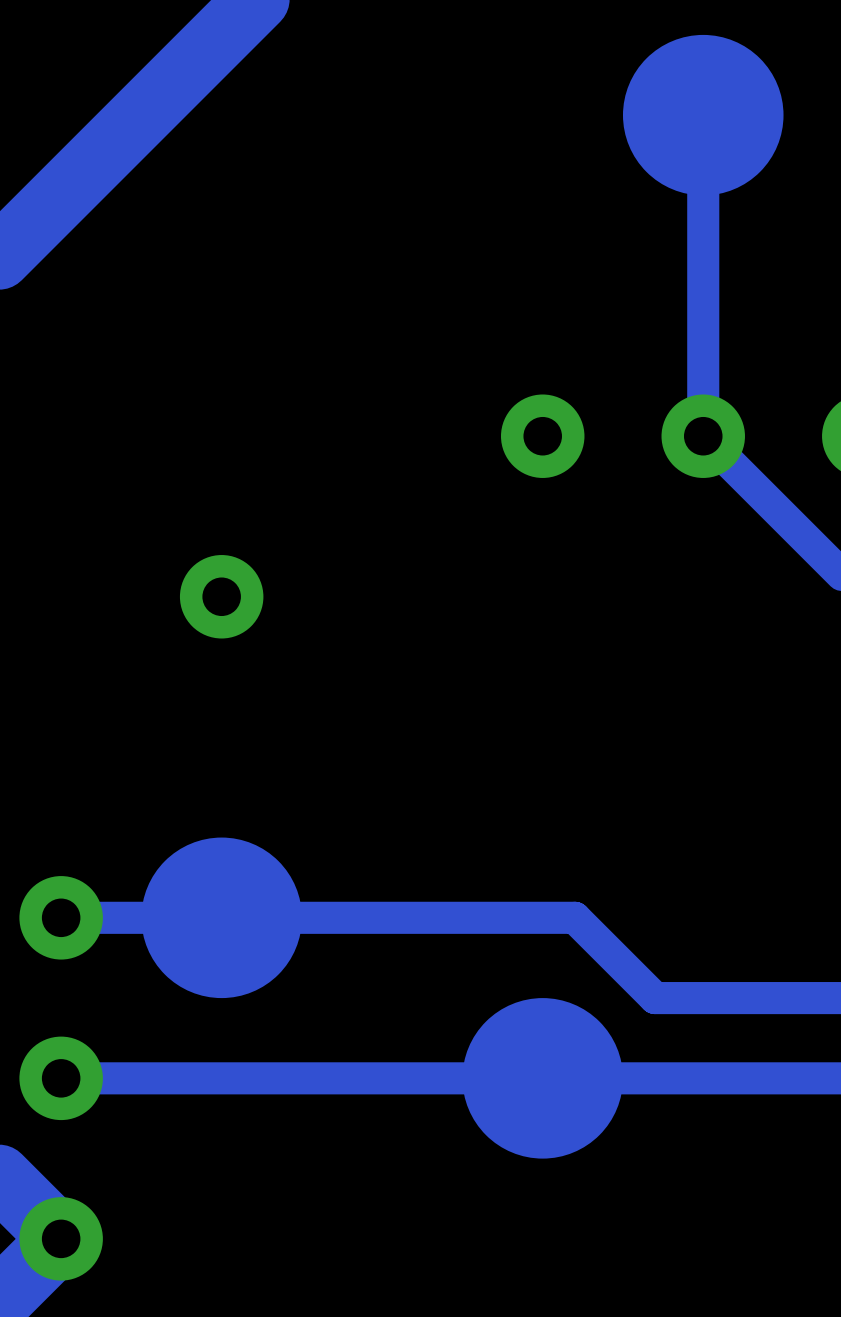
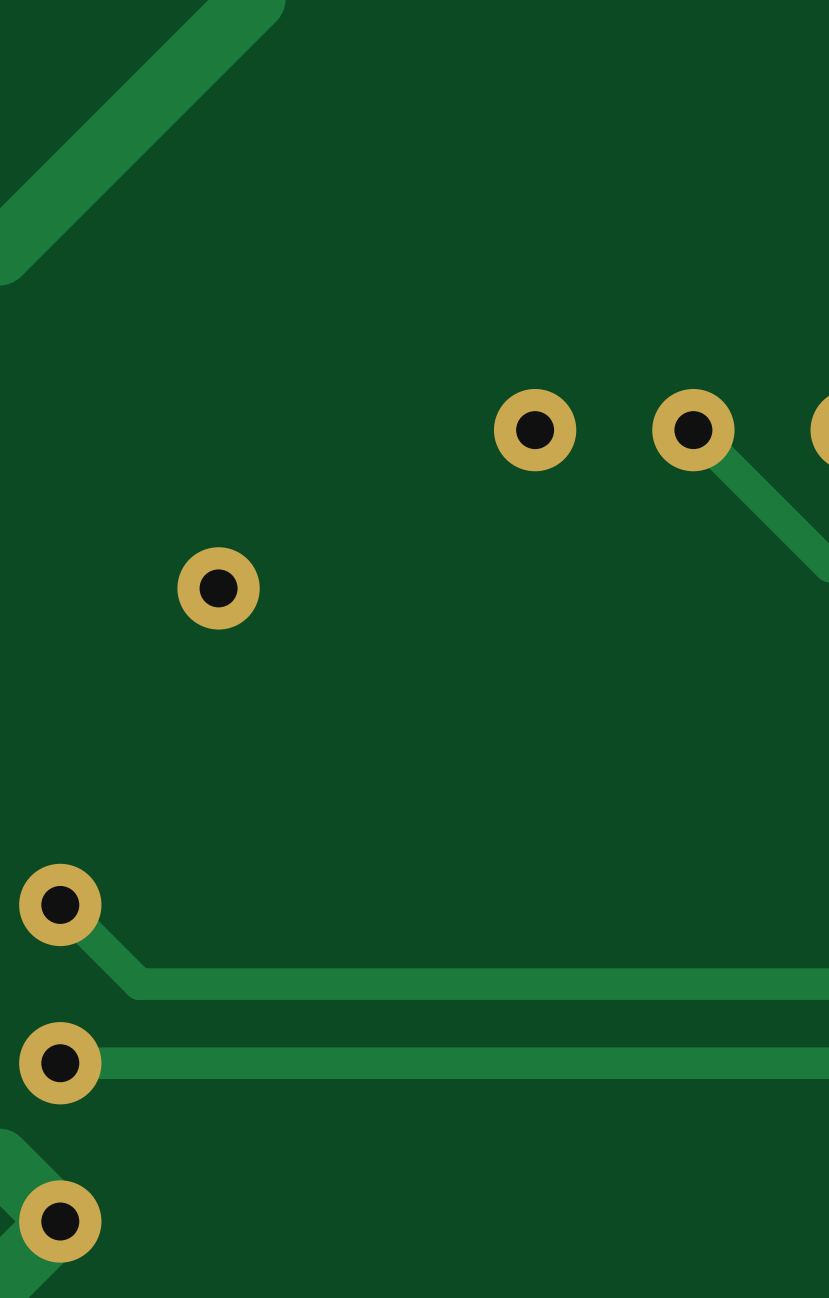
track: (703, 115) (703, 436) -> none
part: (703, 115) -> none
track: (61, 917) (574, 917) (655, 998) -> (60, 904) (139, 984) (645, 984)
part: (221, 917) -> none
part: (542, 1078) -> none

